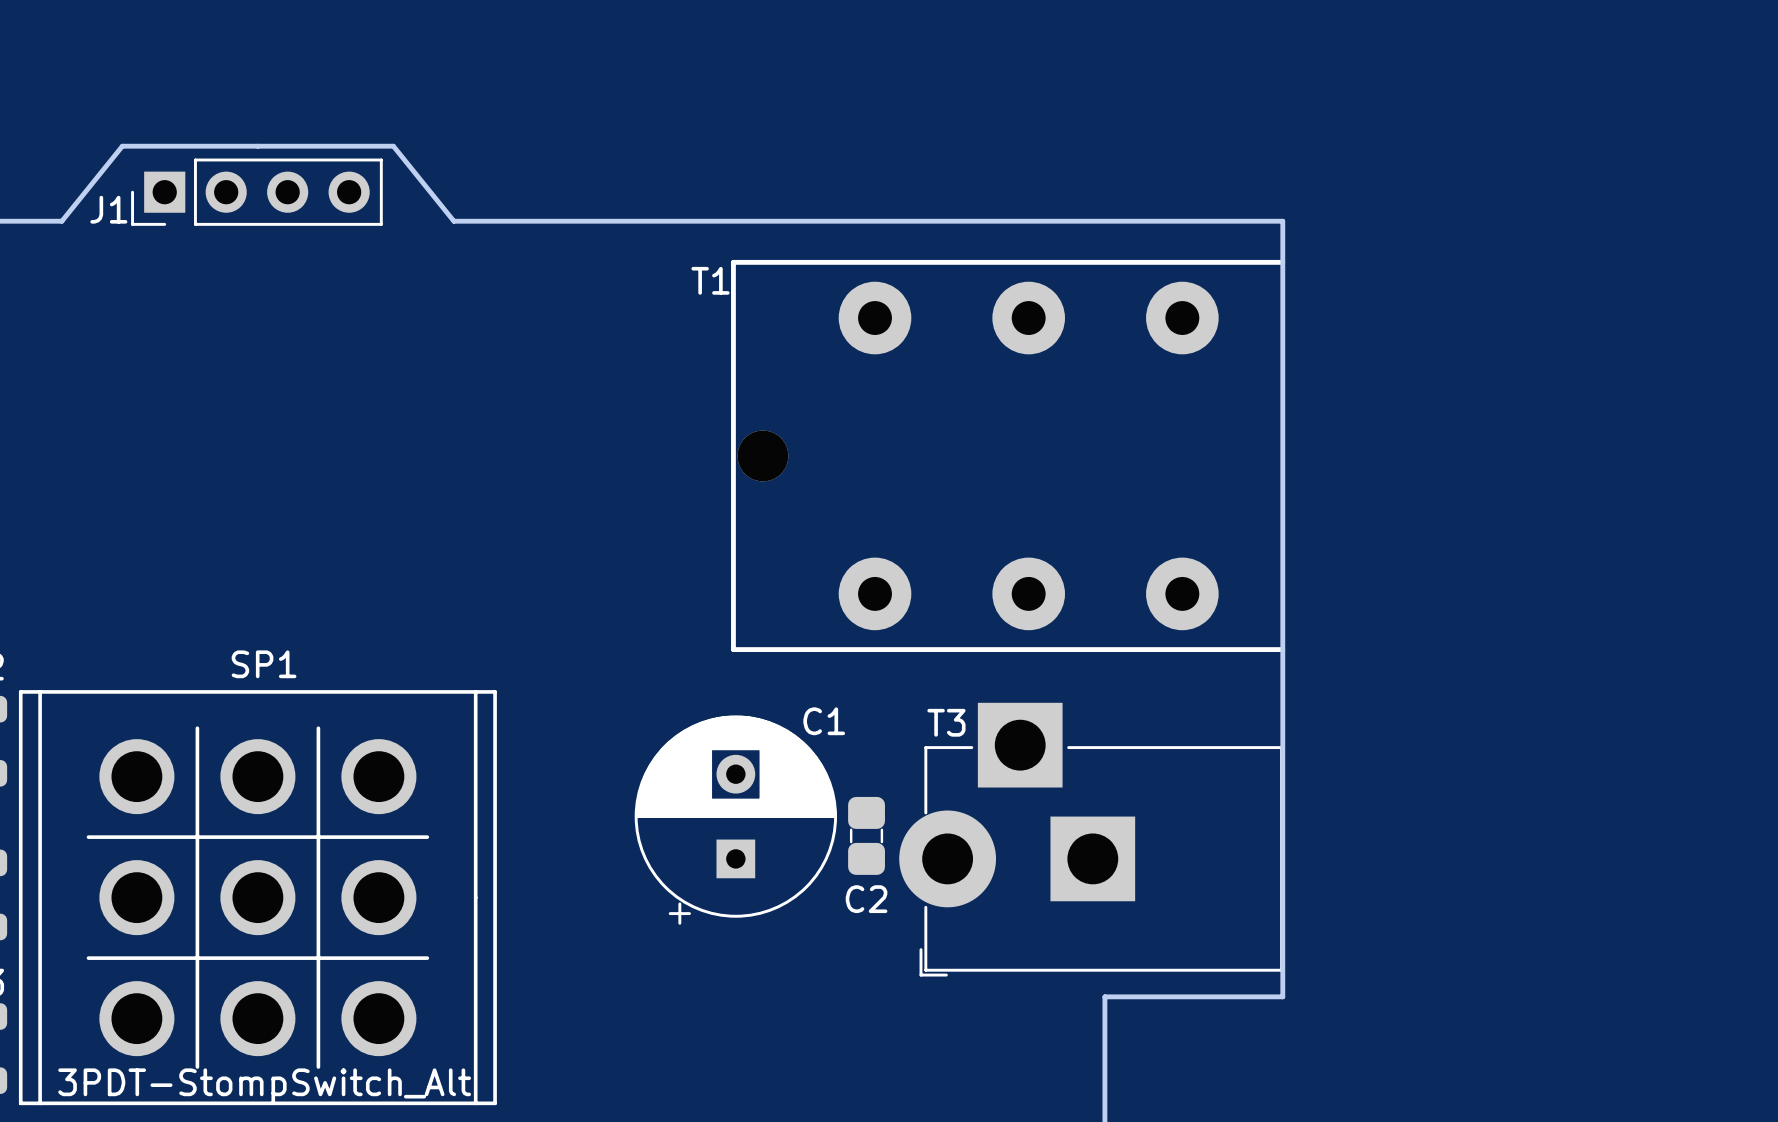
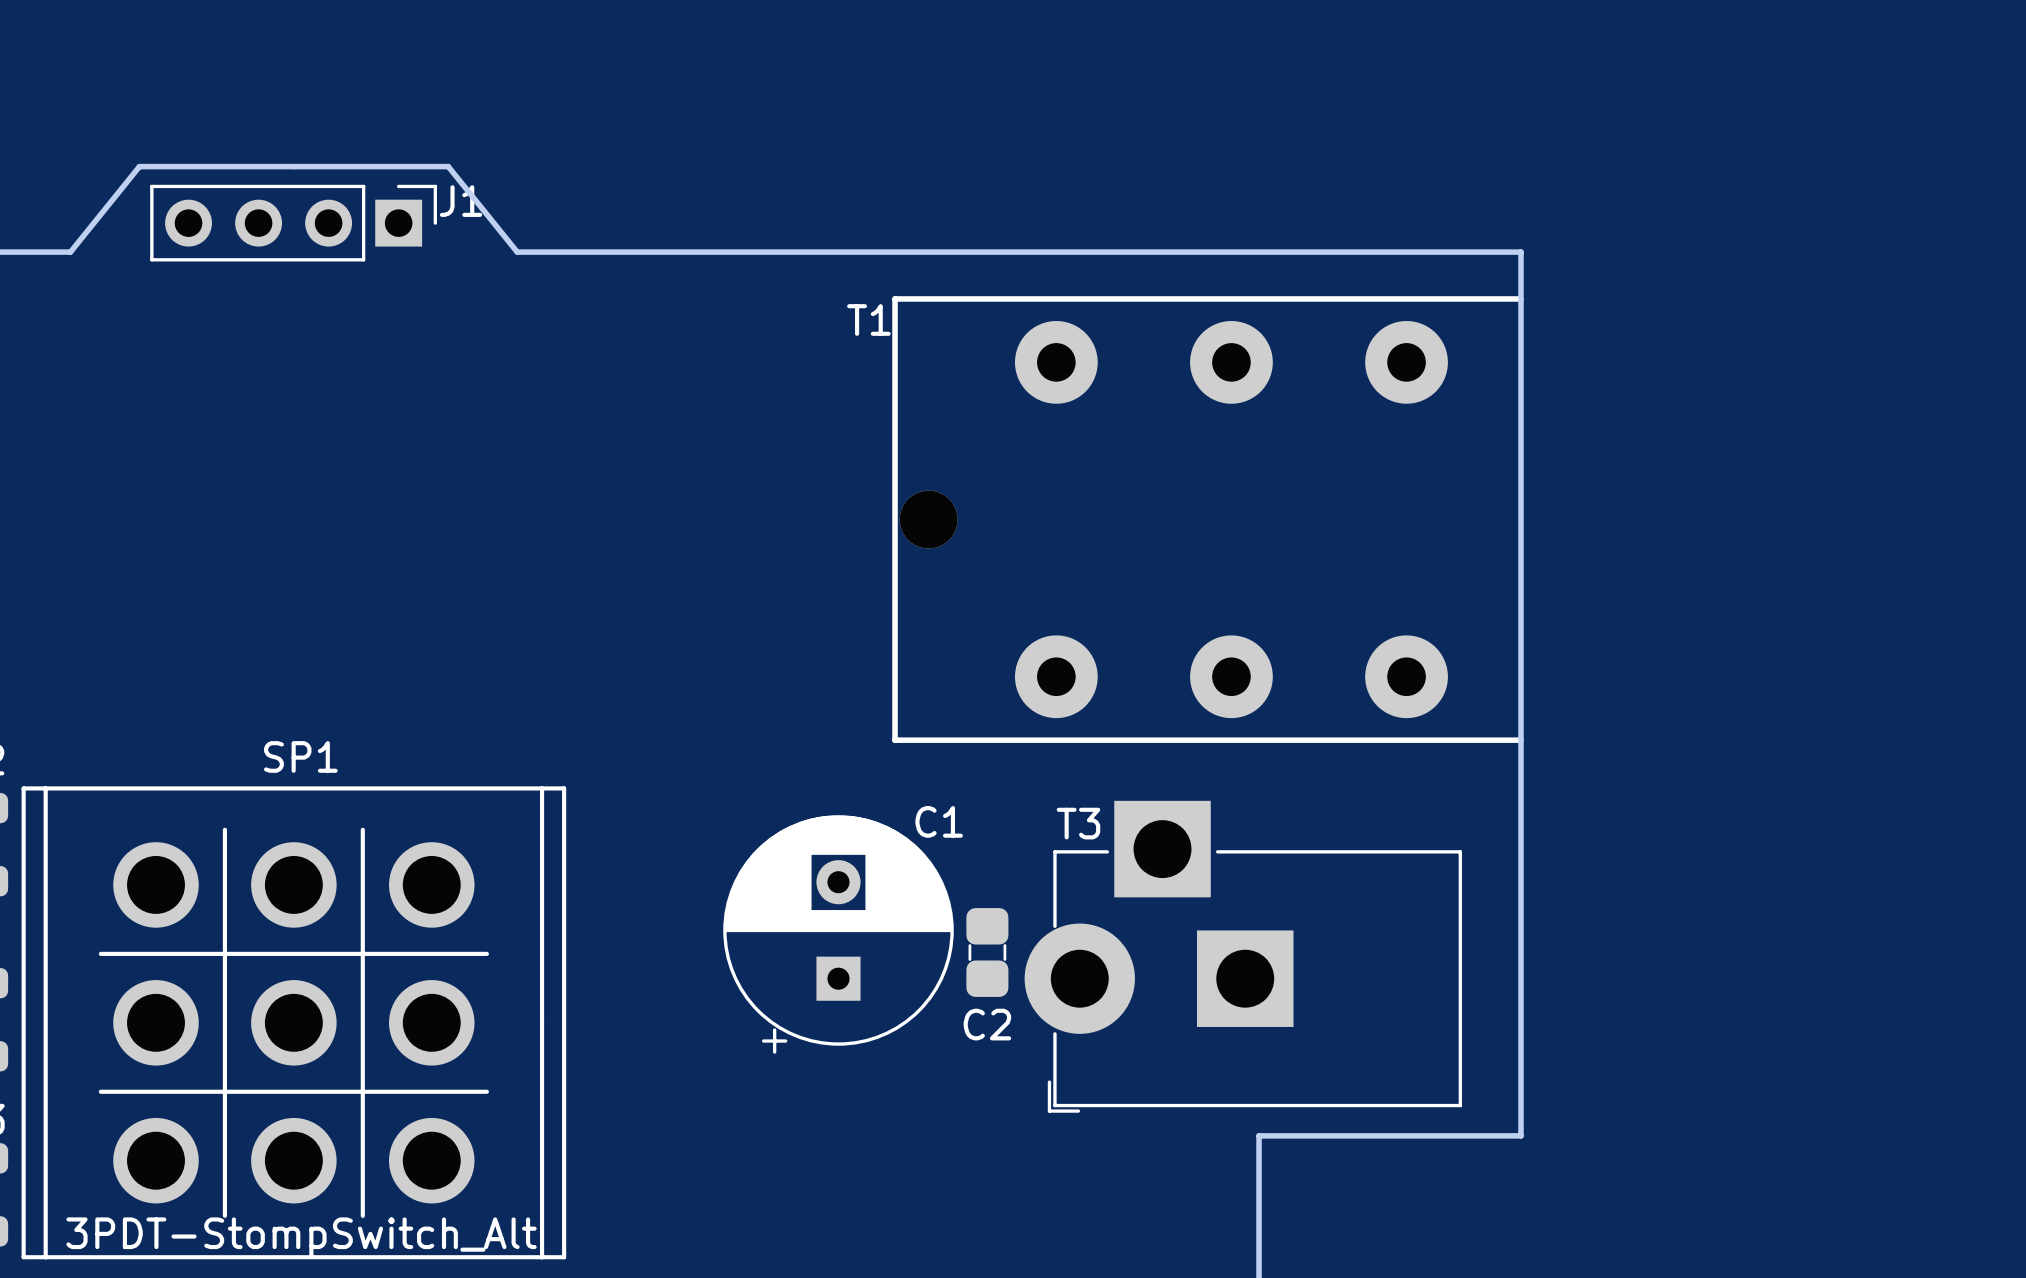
J1 rotation: 0° (256, 192) -> 180° (293, 223)
board edge: (1282, 221) (1282, 996) -> (1461, 252) (1521, 252) (1521, 1135) (1461, 1135)
T1 position: (1008, 455) -> (1208, 519)

